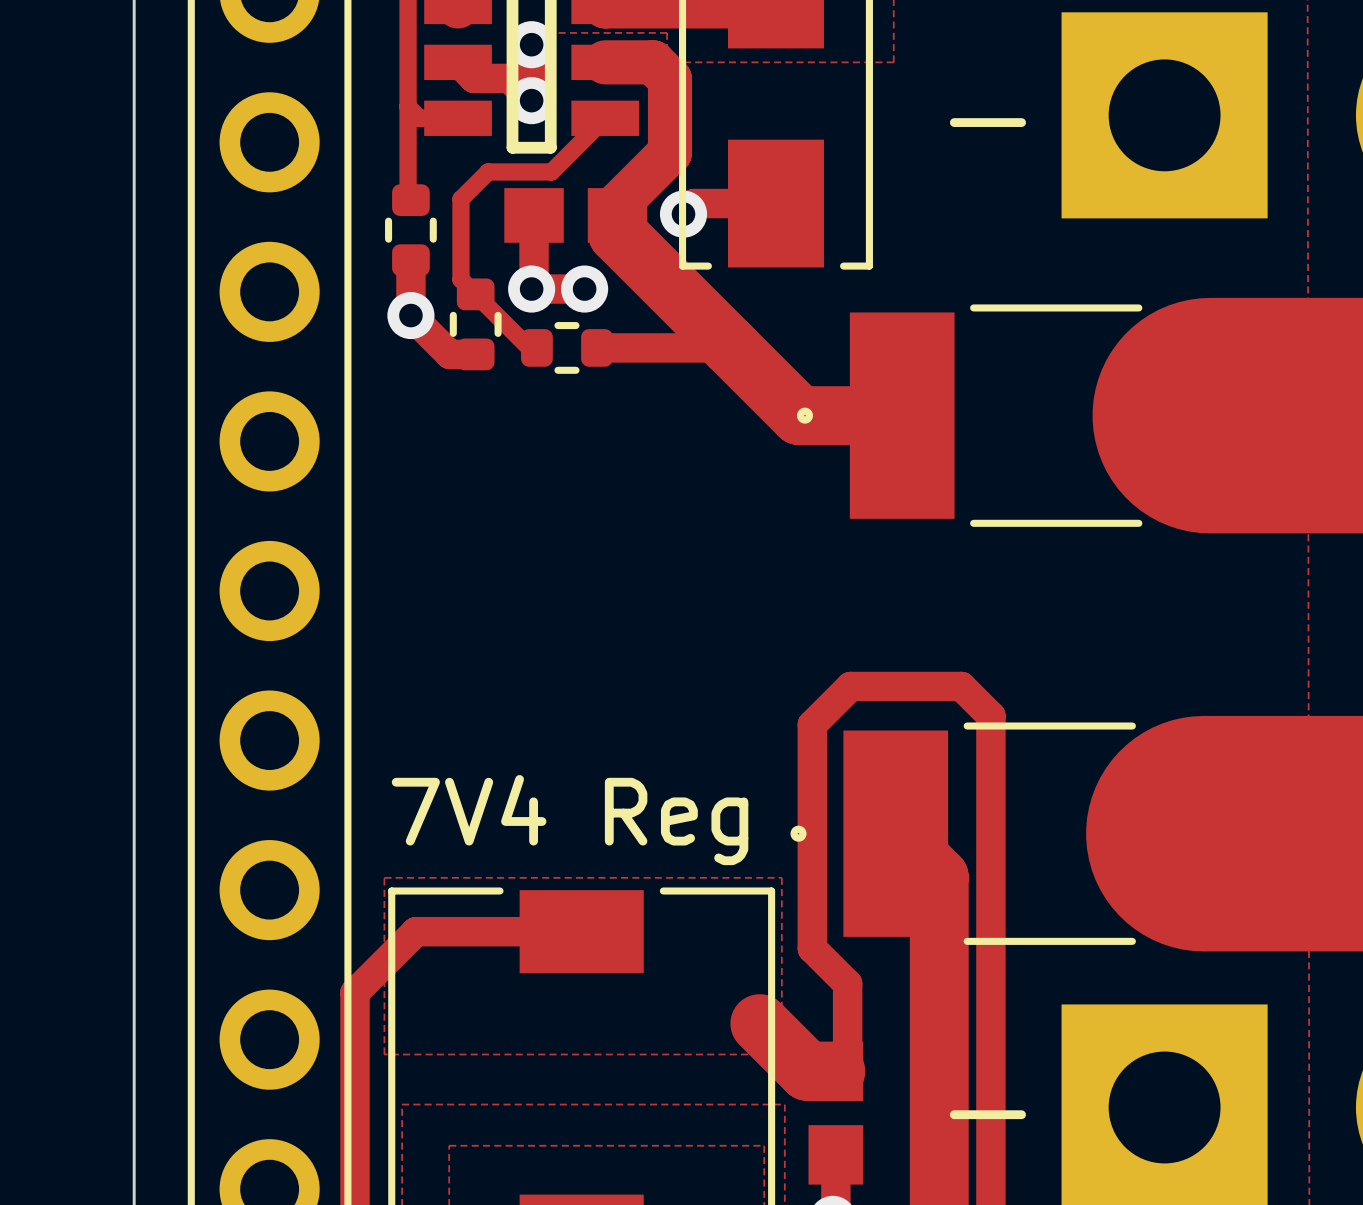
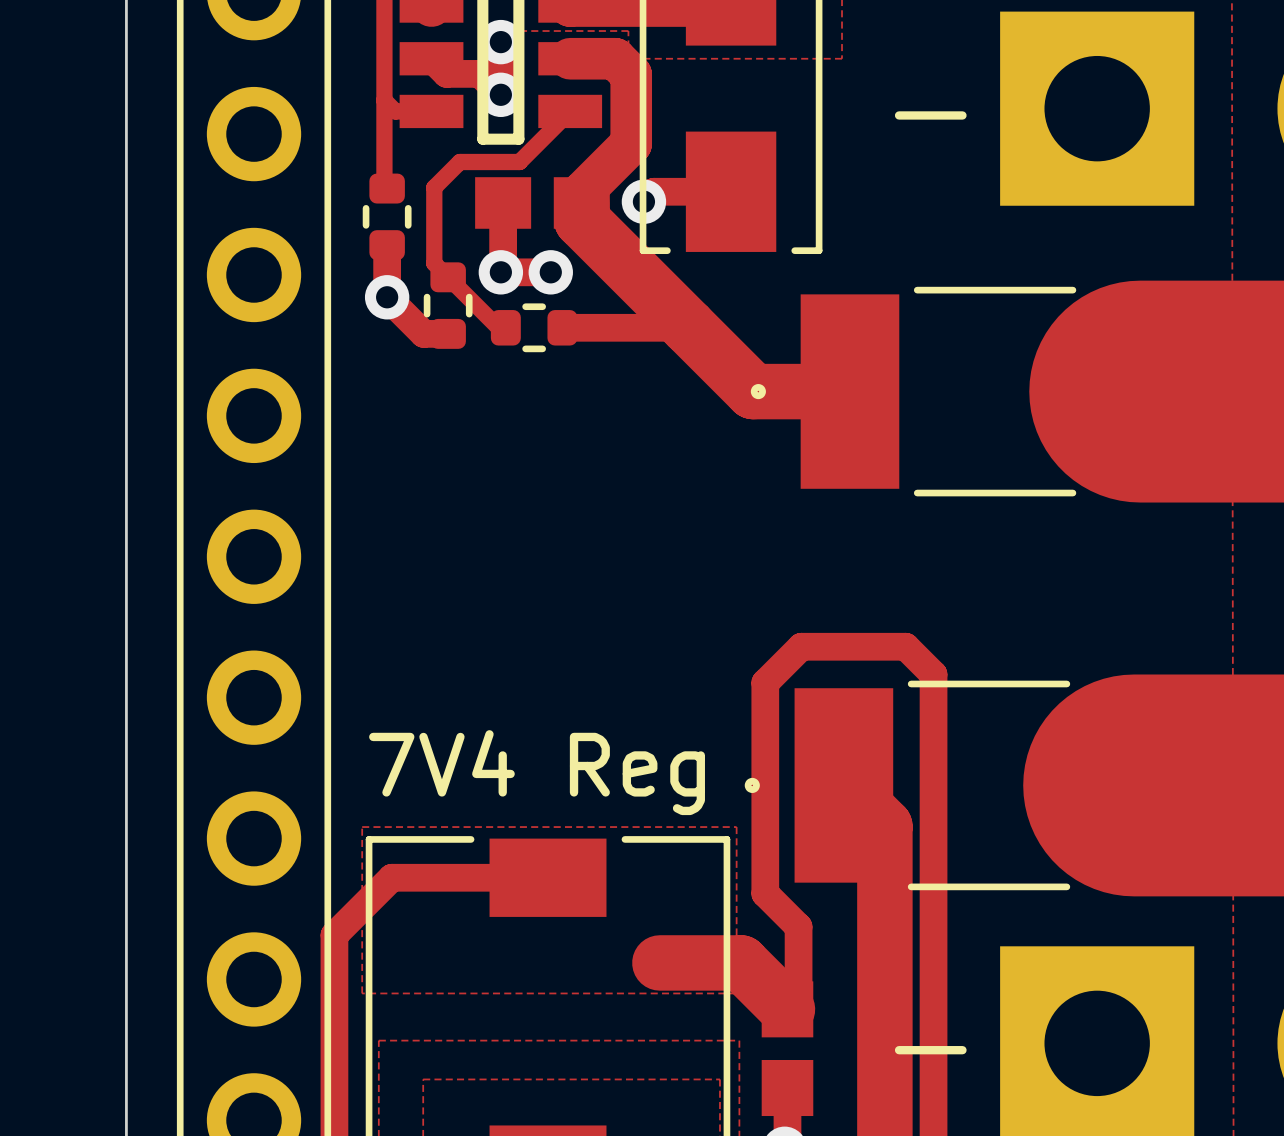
track: (759, 1023) (807, 1071) (835, 1071) -> (659, 962) (741, 962) (787, 1009)

